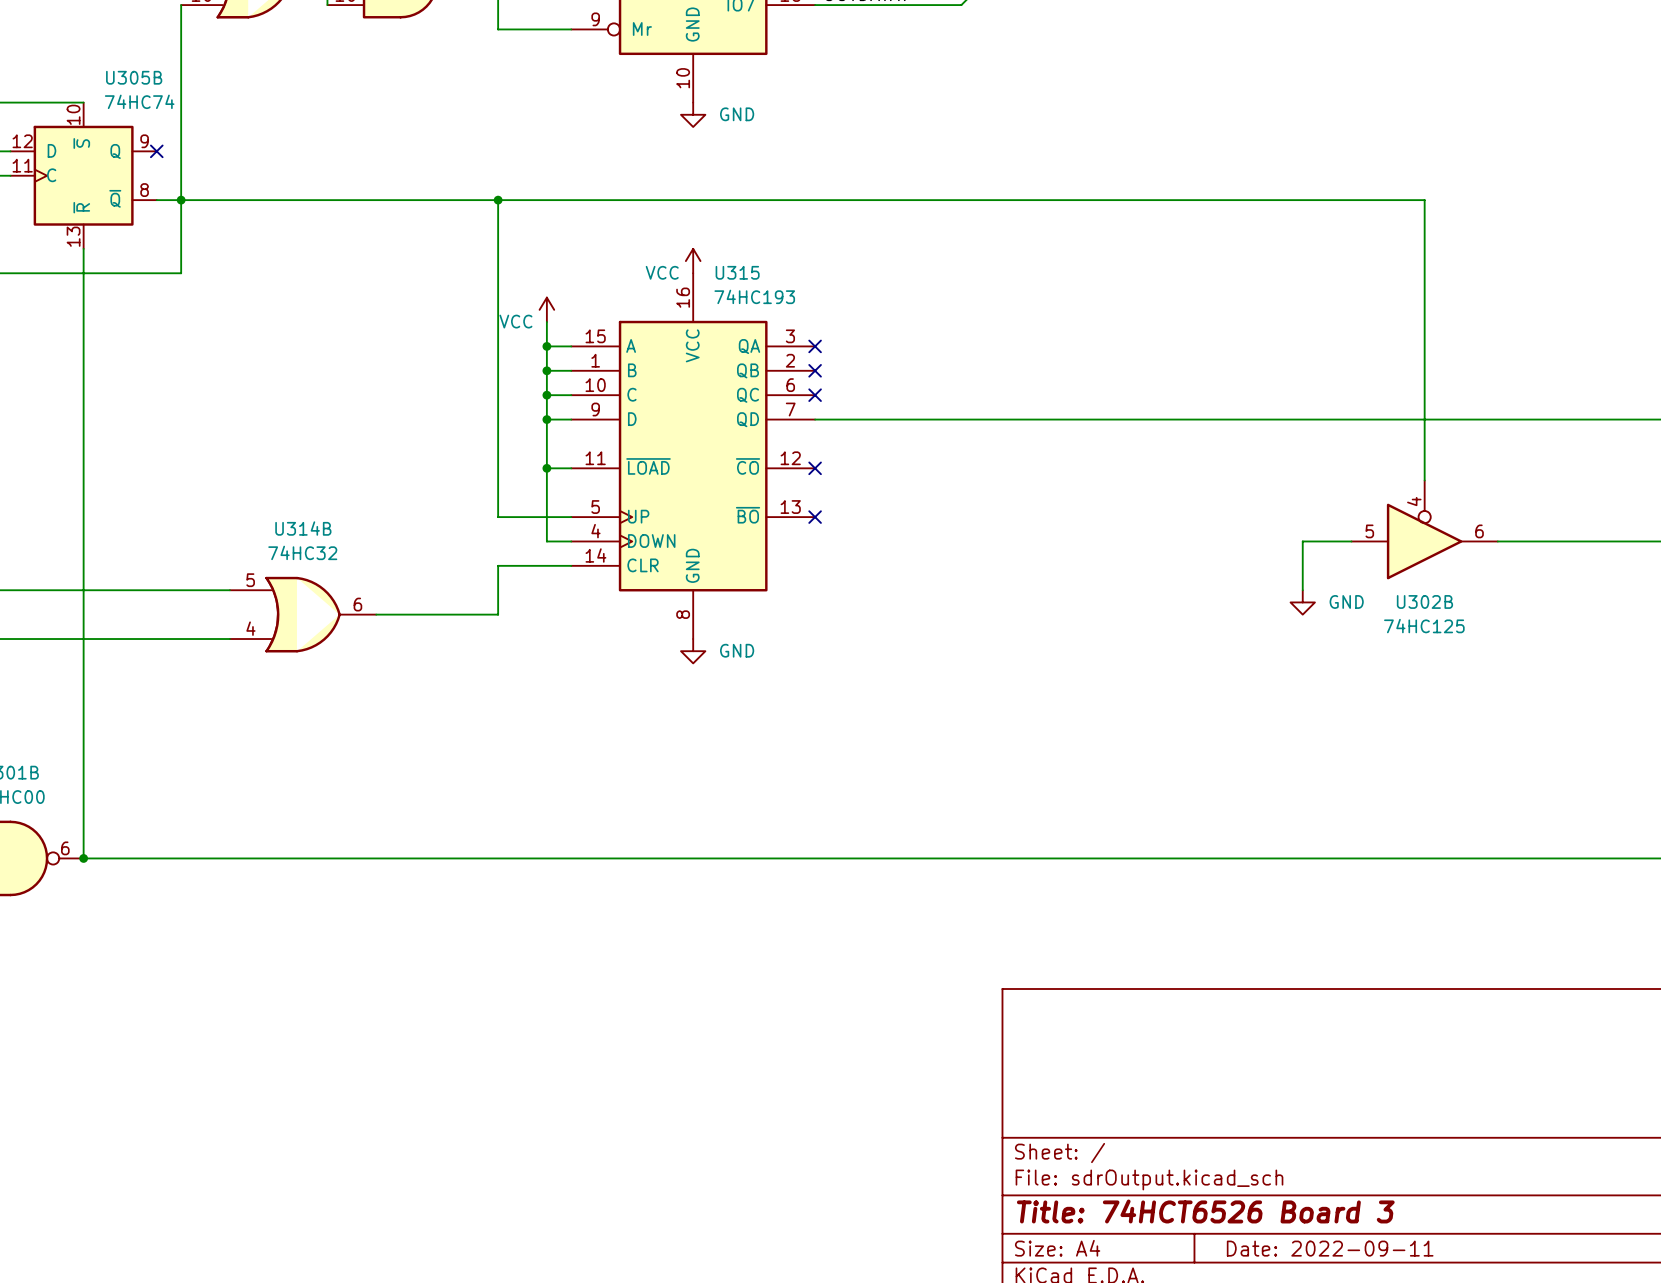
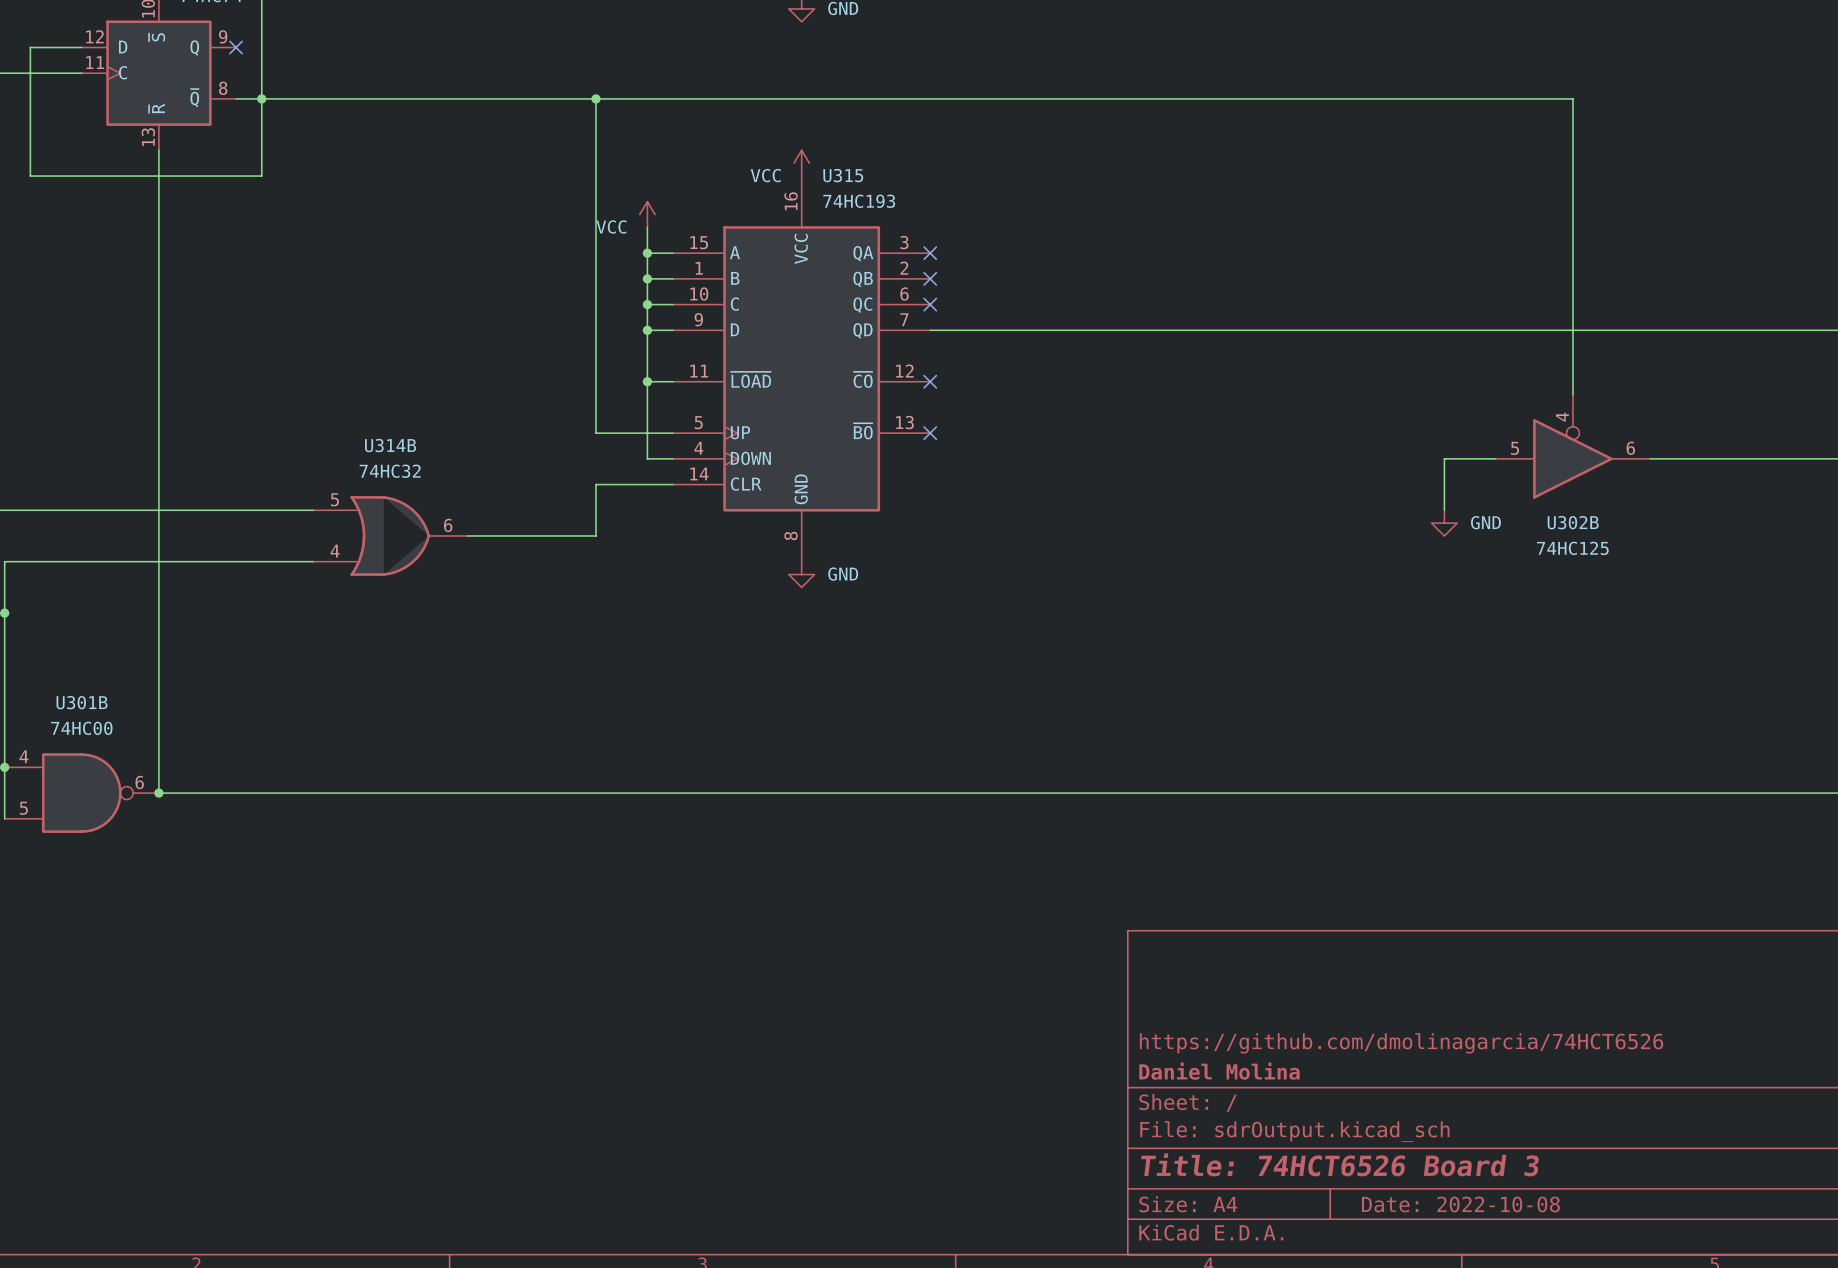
title block: none -> https://github.com/dmolinagarcia/74HCT6526 (1401, 1043)
title block: none -> Daniel Molina (1219, 1071)
title block: Date: 2022-09-11 (1330, 1248) -> Date: 2022-10-08 (1460, 1204)

